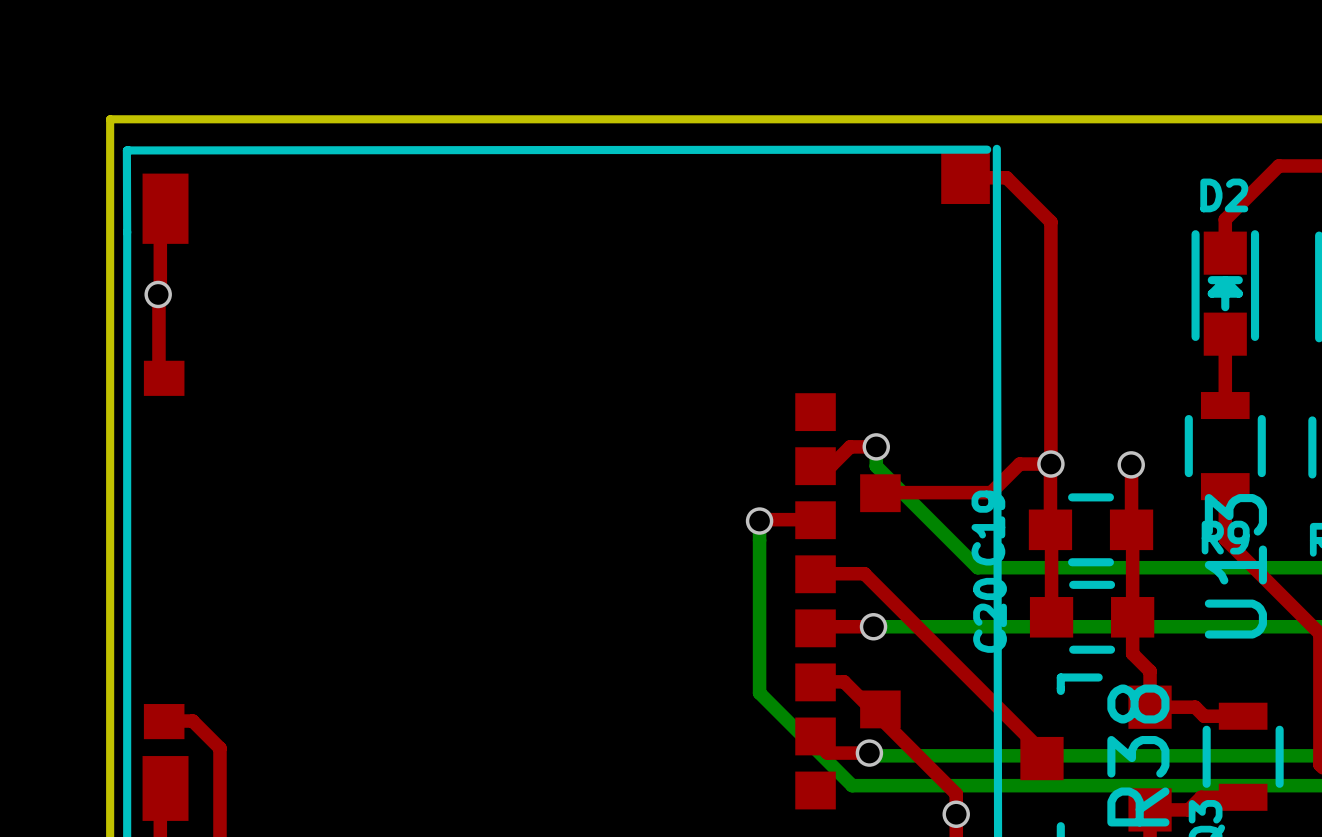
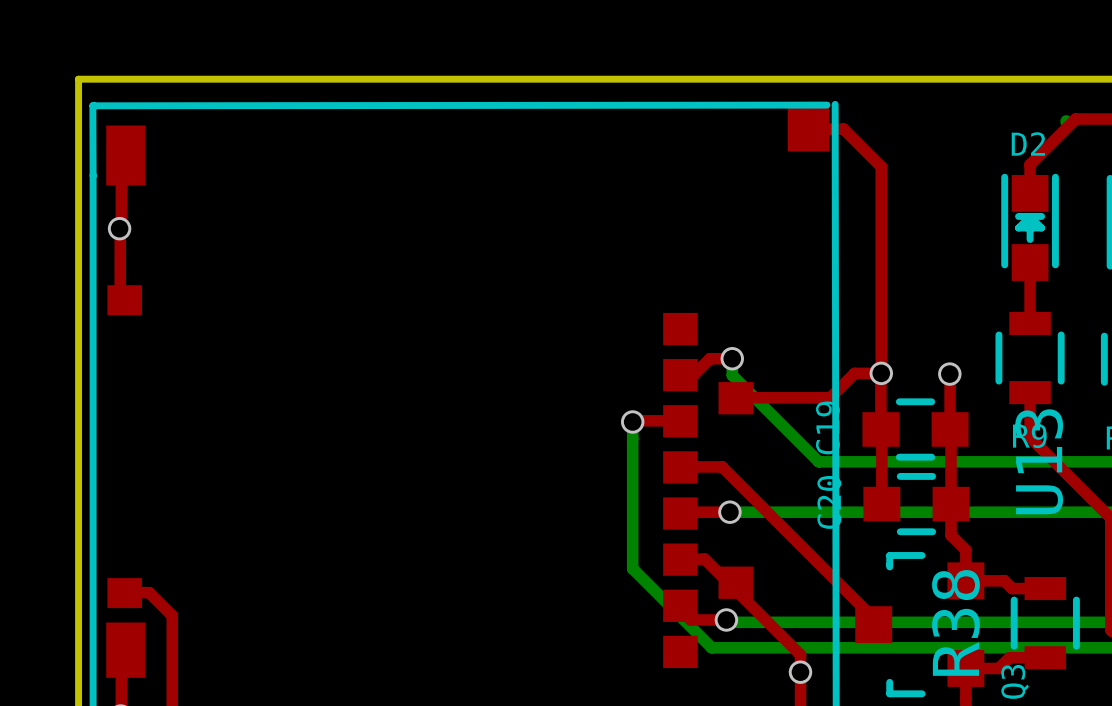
bottom track: none -> (1066, 120) (1066, 122)

